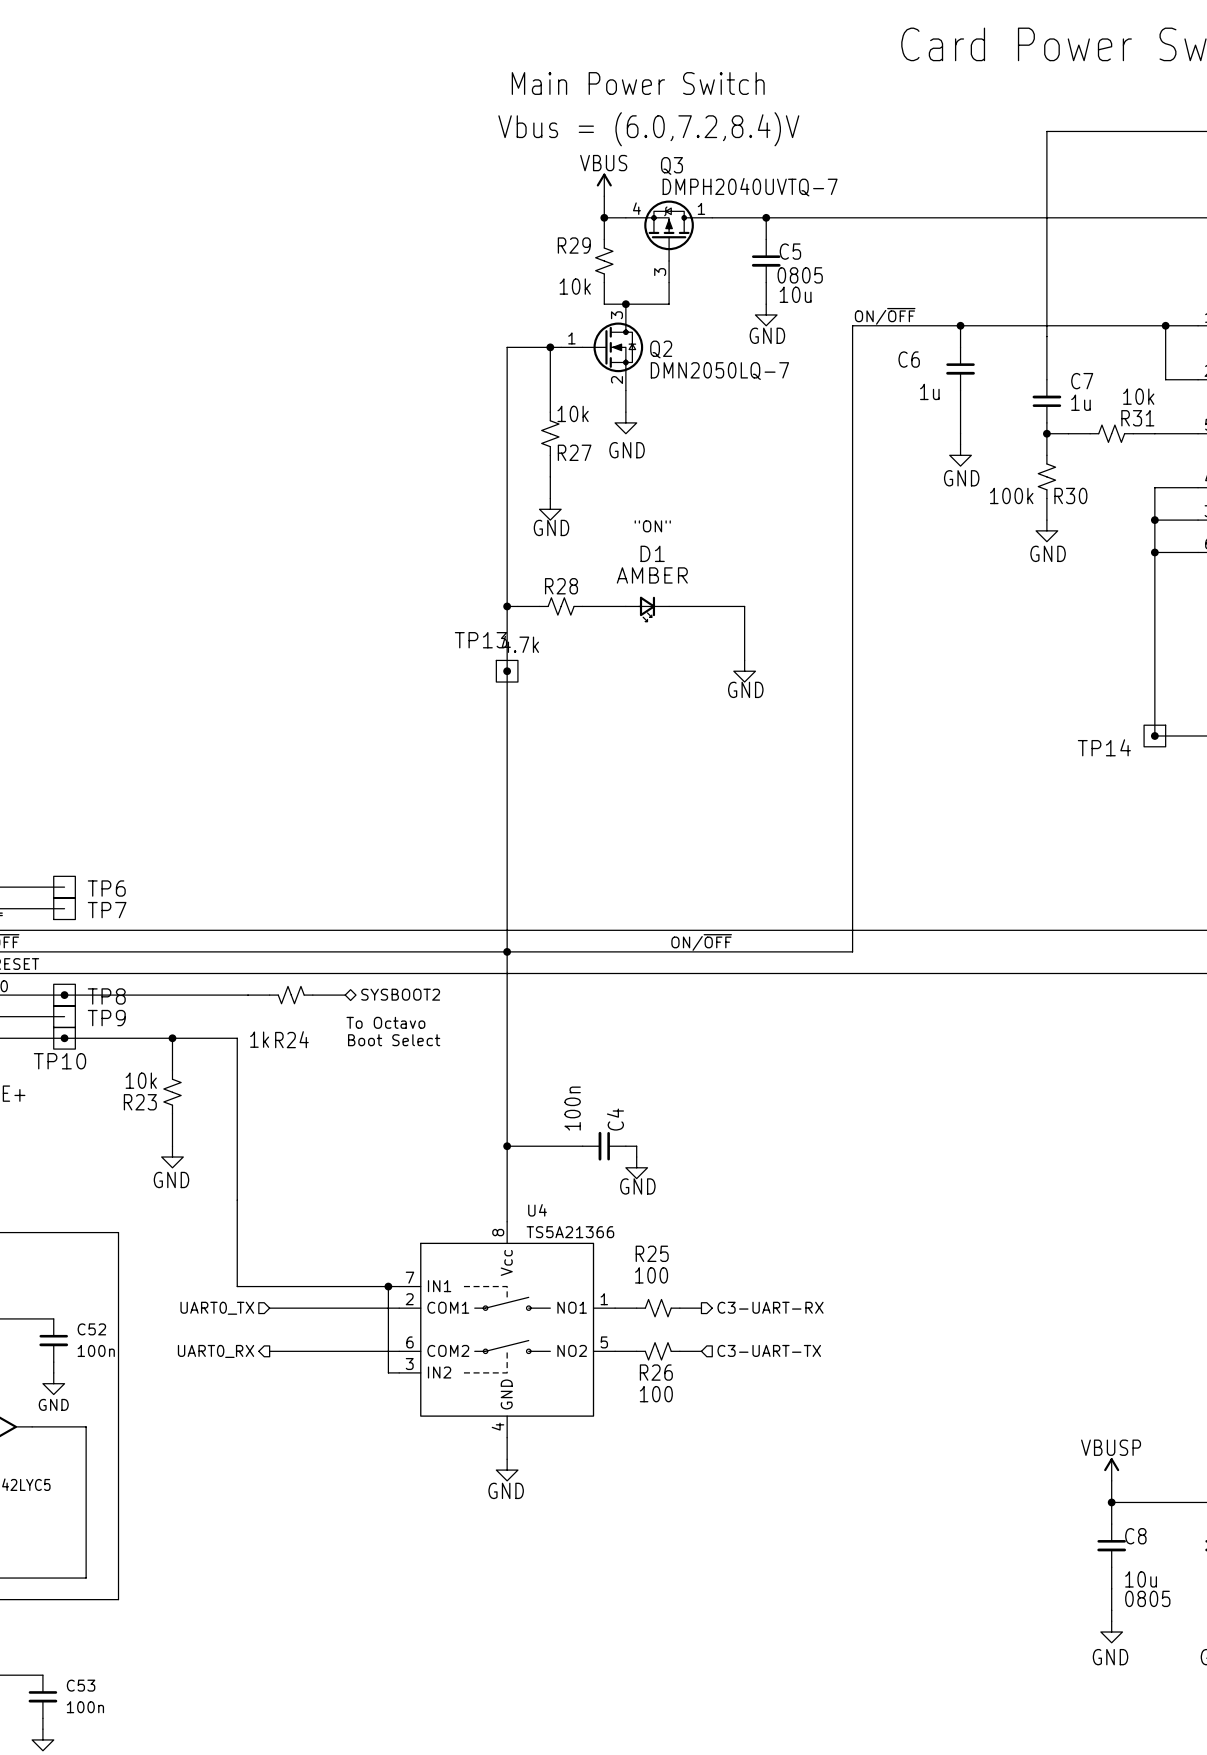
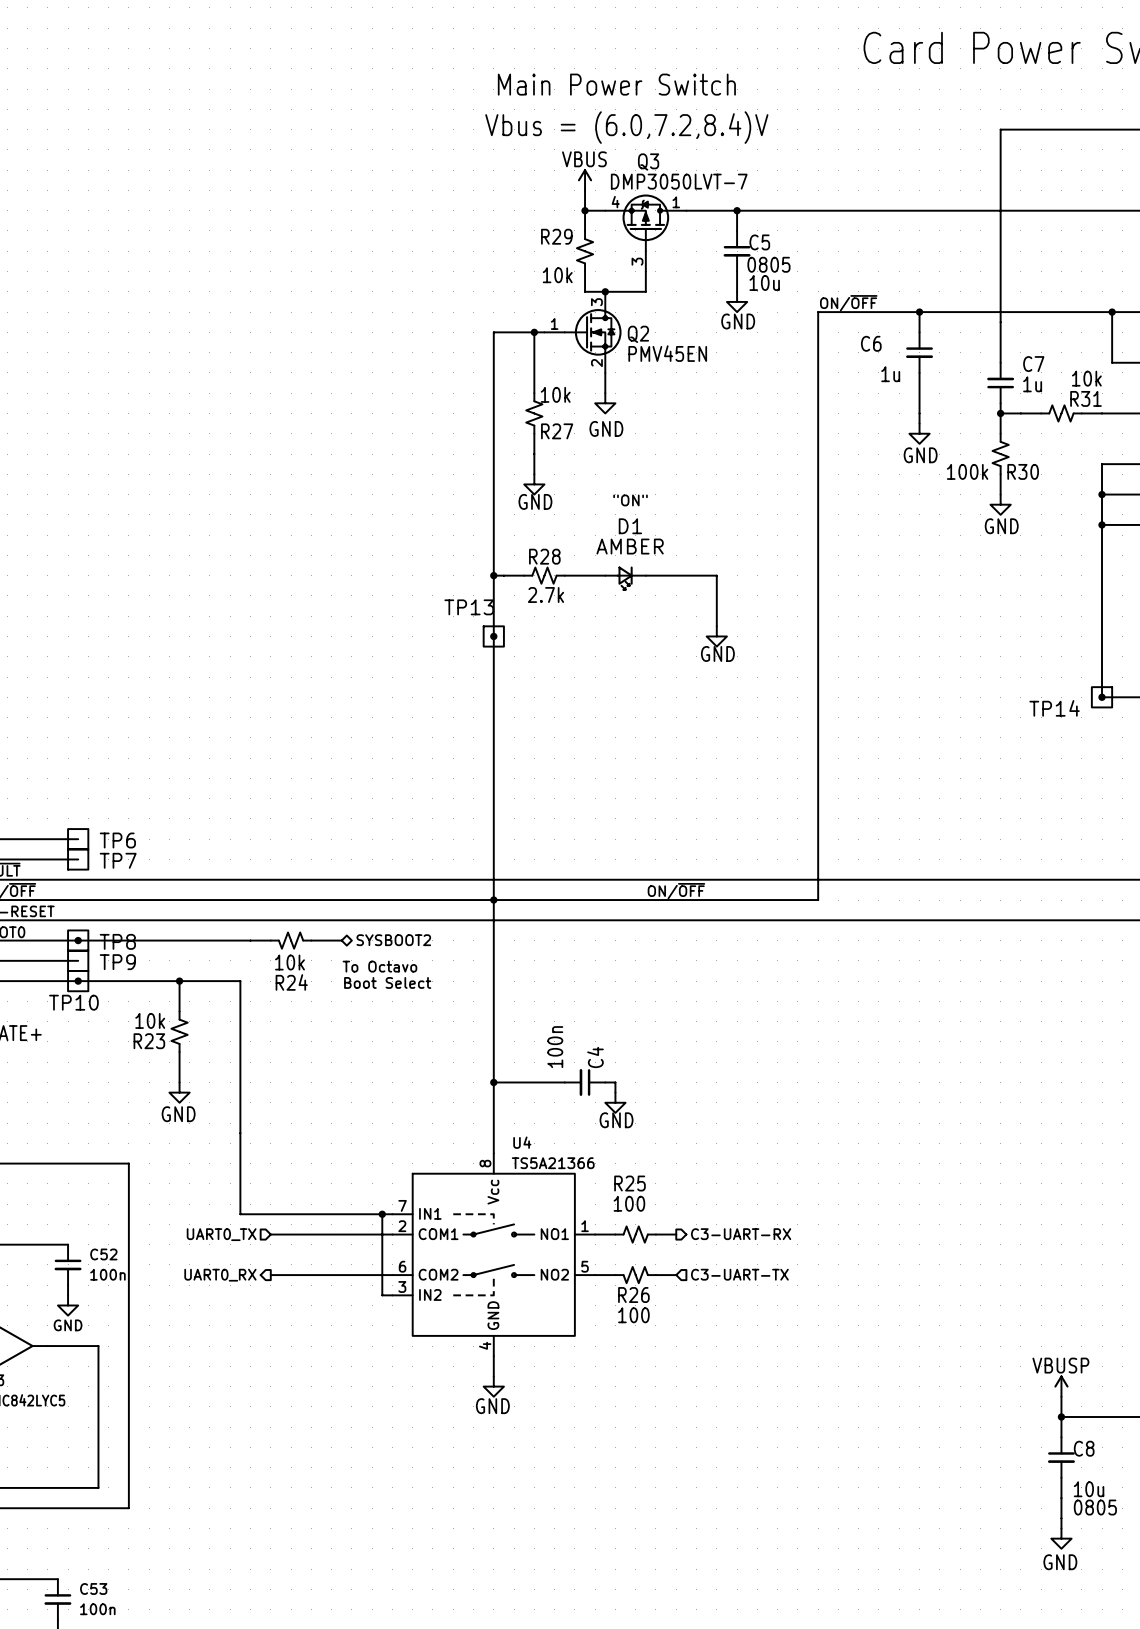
Q3 value: DMPH2040UVTQ-7 (750, 187) -> DMP3050LVT-7 (679, 181)
Q2 value: DMN2050LQ-7 (719, 371) -> PMV45EN (667, 353)
R28 value: 4.7k (520, 644) -> 2.7k (545, 594)
R24 value: 1k (259, 1039) -> 10k (289, 962)

